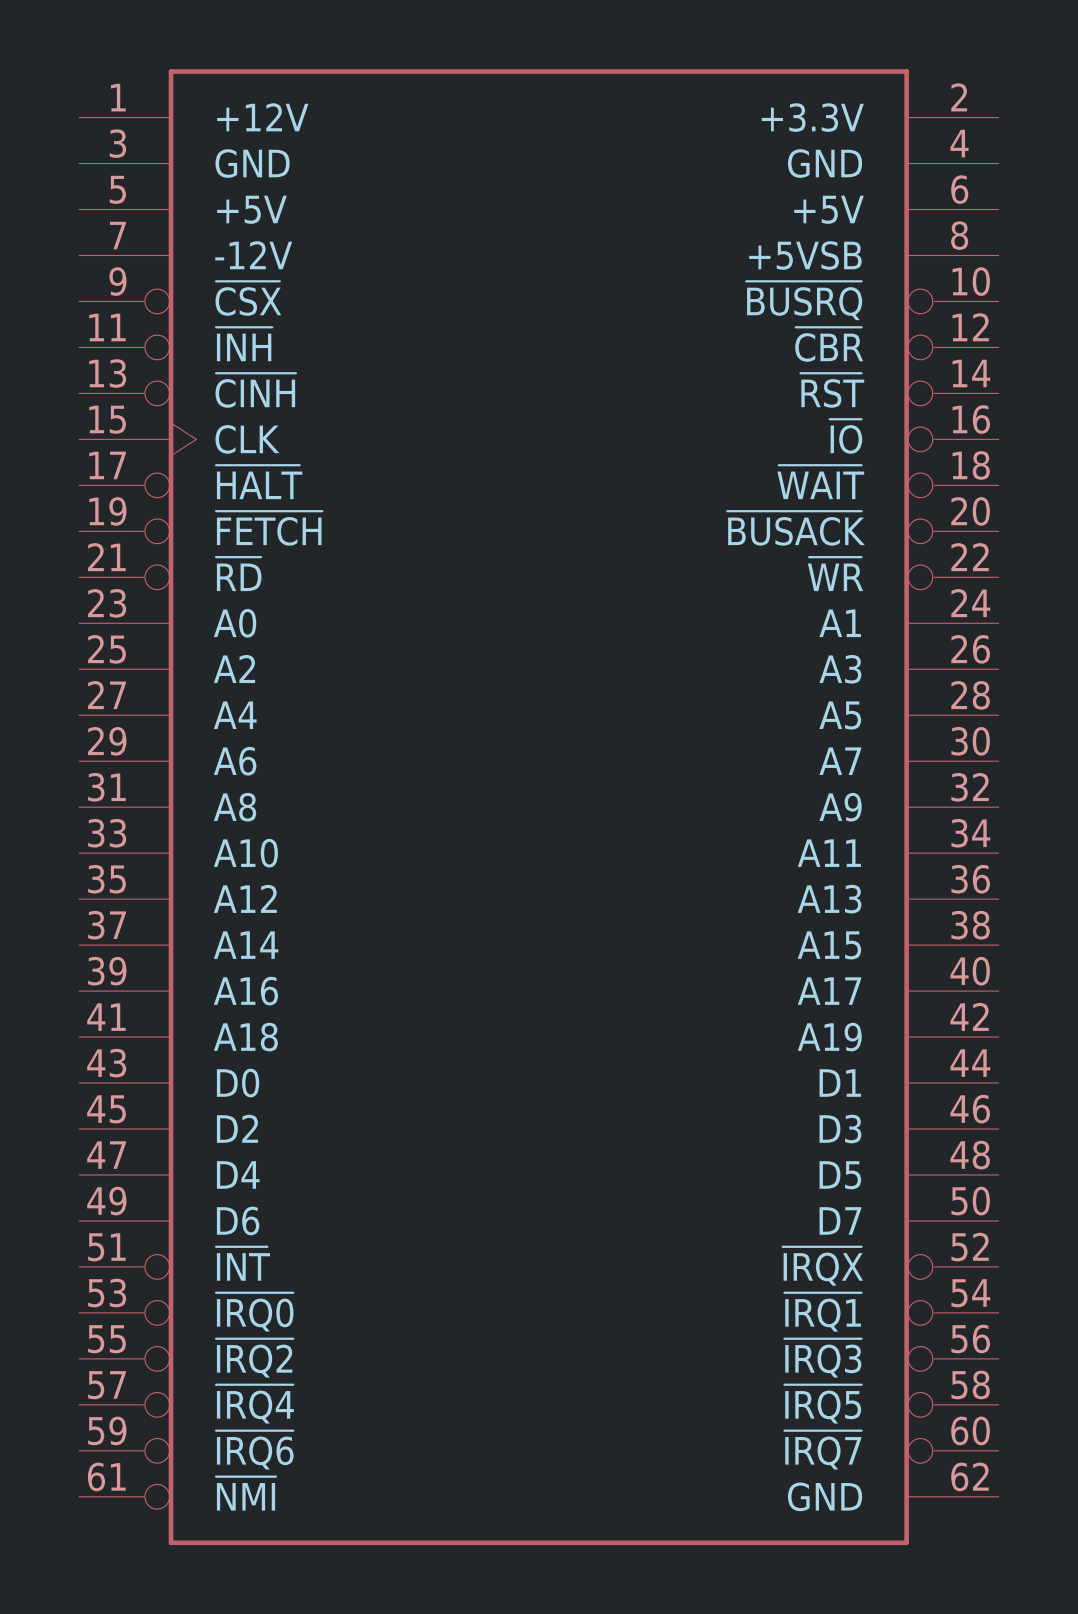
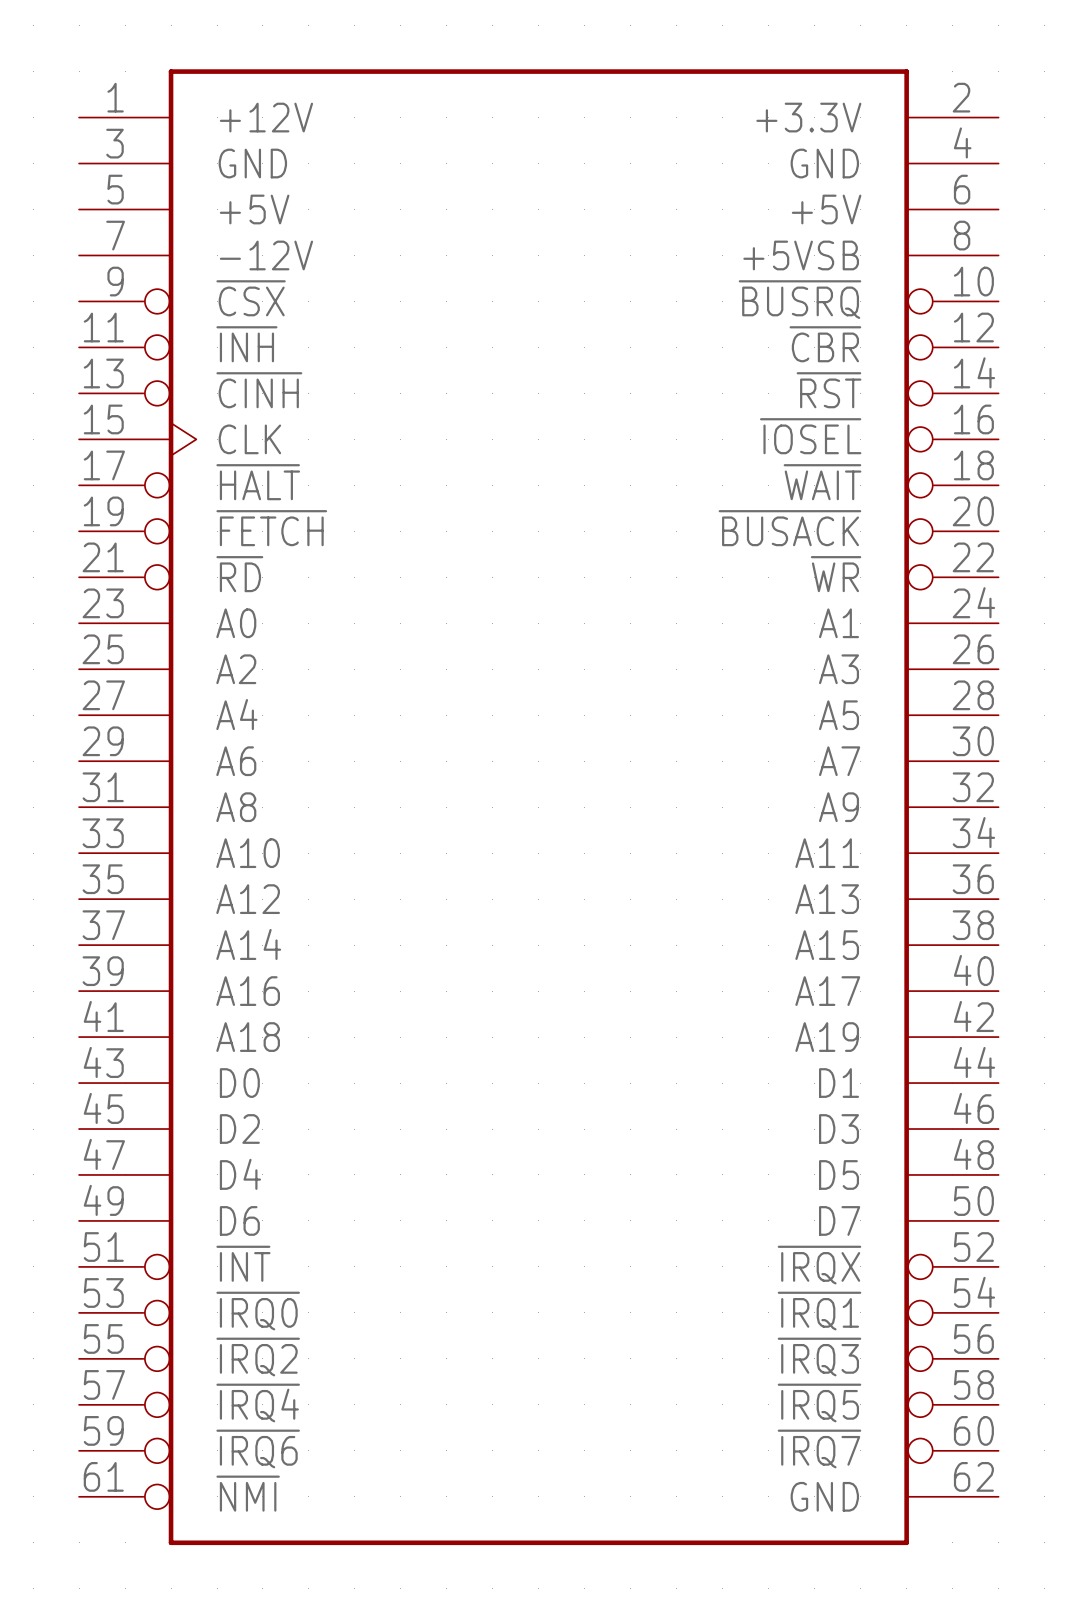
part pin name: ~{IO} (845, 436) -> ~{IOSEL} (810, 436)

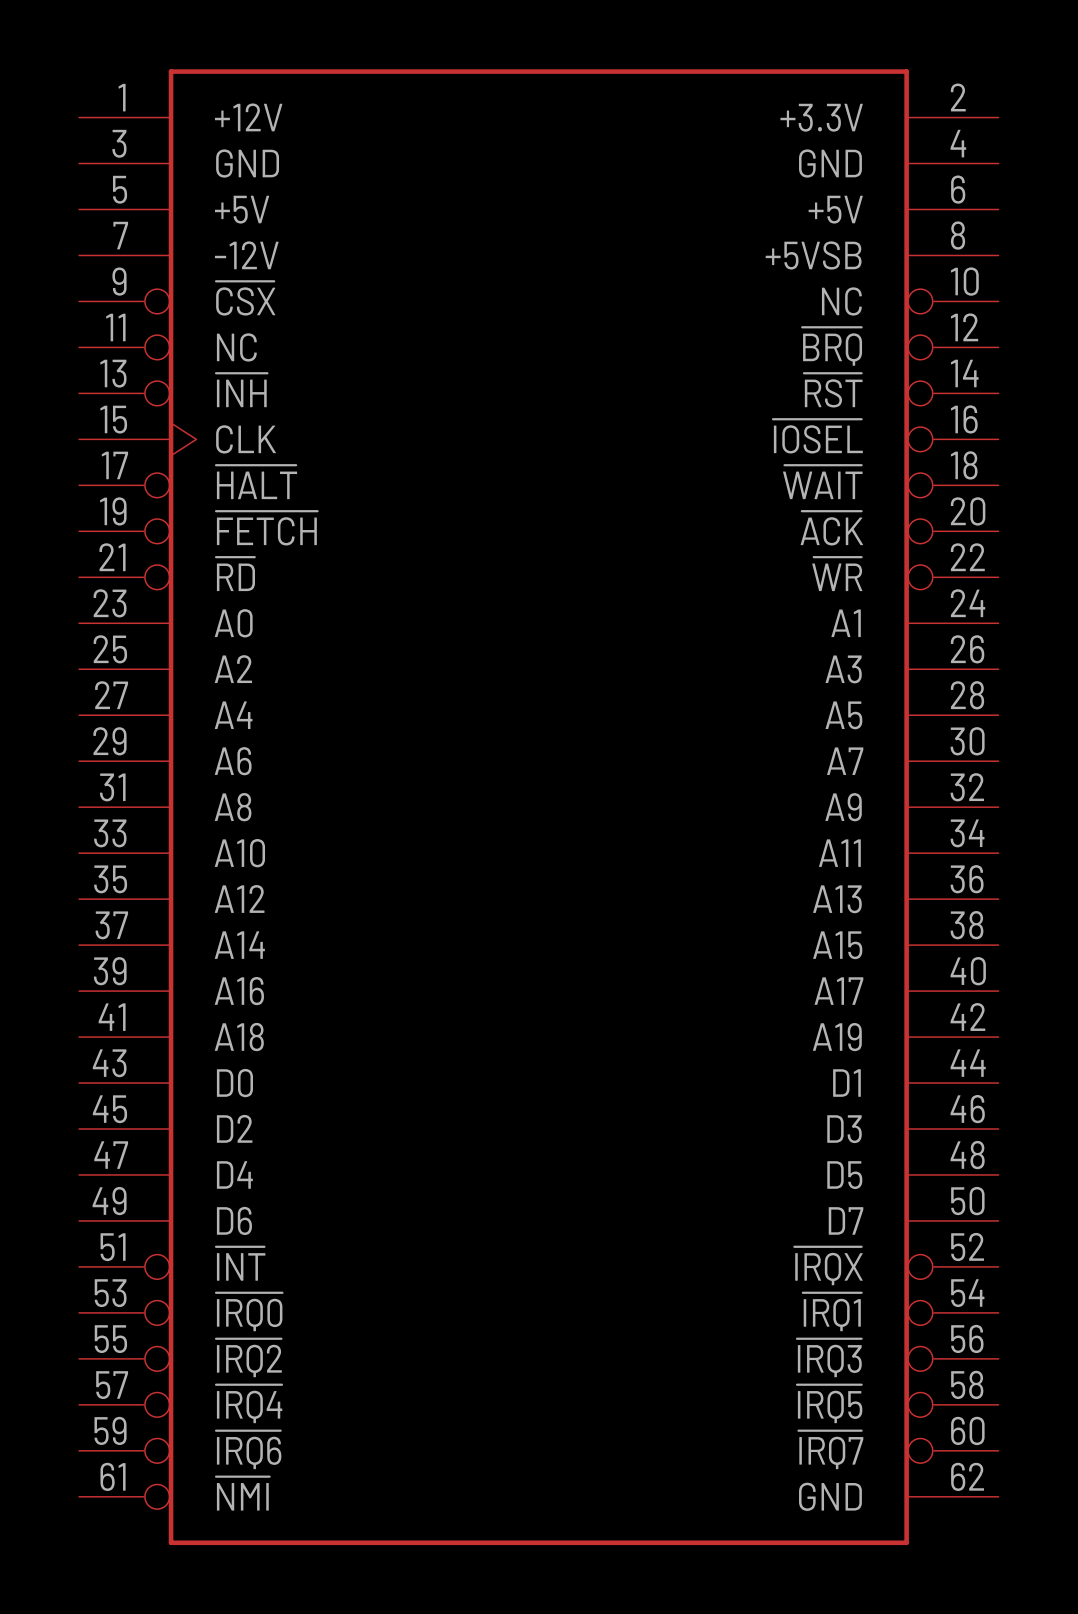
part pin name: ~{BUSRQ} (799, 299) -> NC (841, 301)
part pin name: ~{INH} (246, 344) -> NC (236, 347)
part pin name: ~{CBR} (825, 344) -> ~{BRQ} (832, 346)
part pin name: ~{CINH} (259, 390) -> ~{INH} (241, 390)
part pin name: ~{BUSACK} (789, 528) -> ~{ACK} (831, 528)

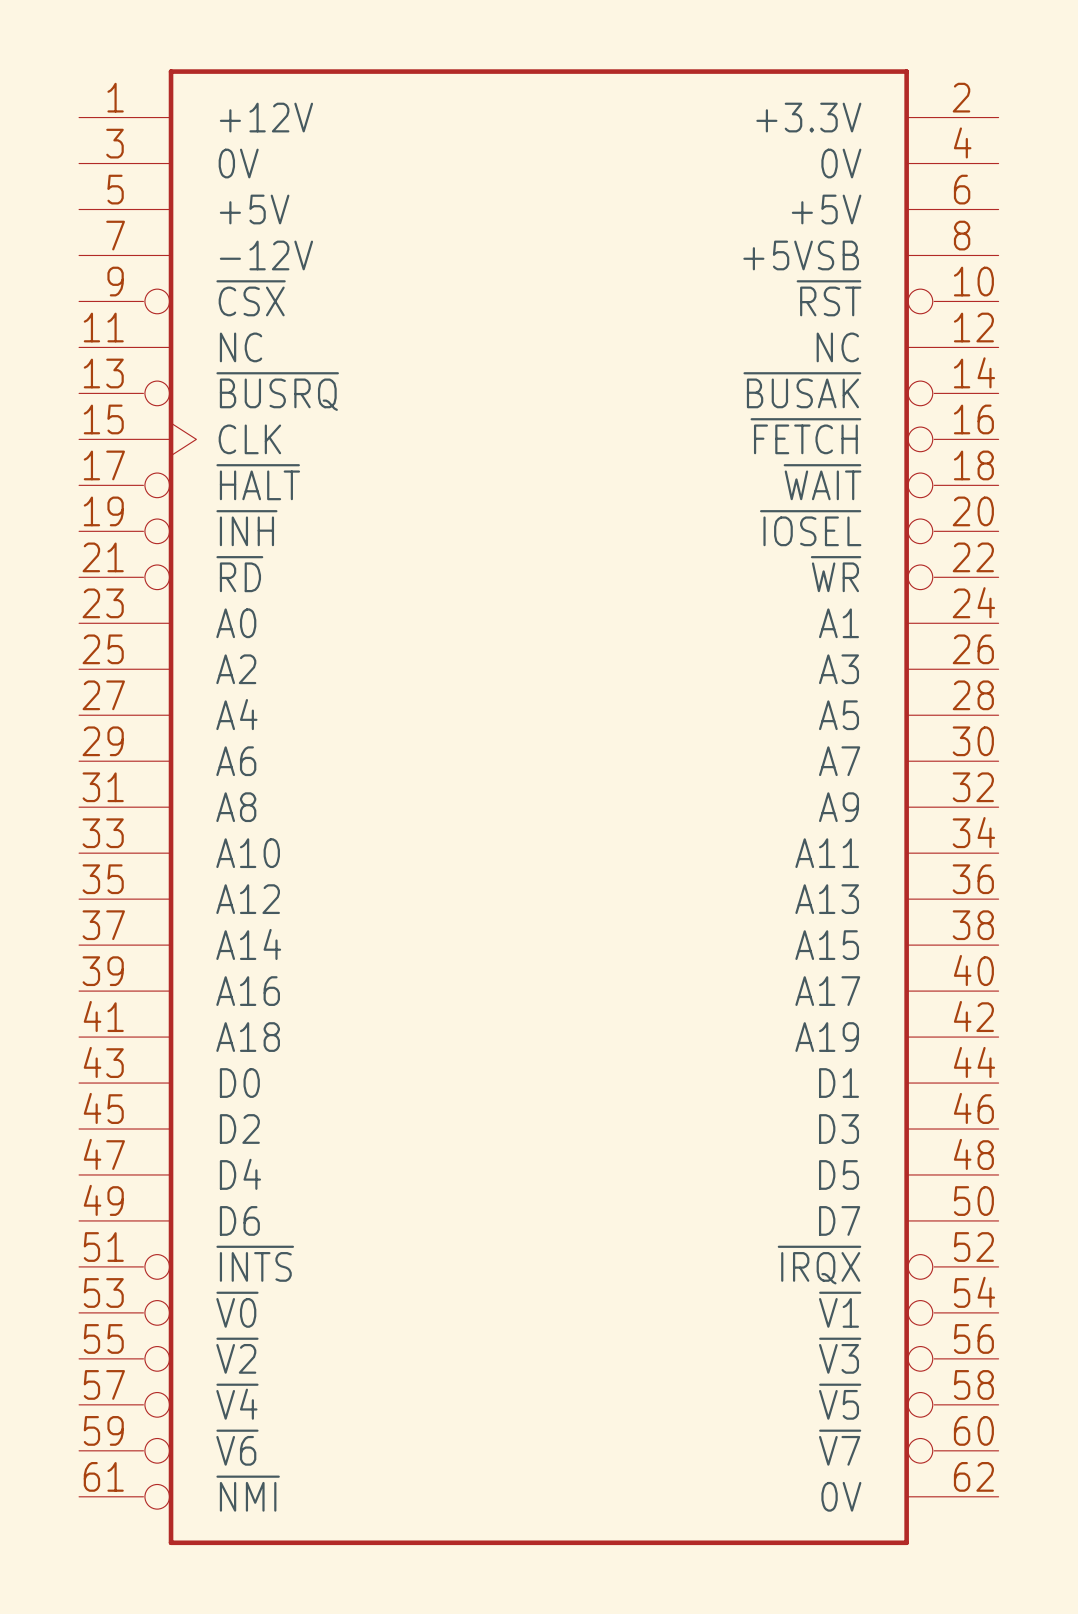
part symbol: [79, 69, 999, 1546] -> [79, 69, 999, 1546]

